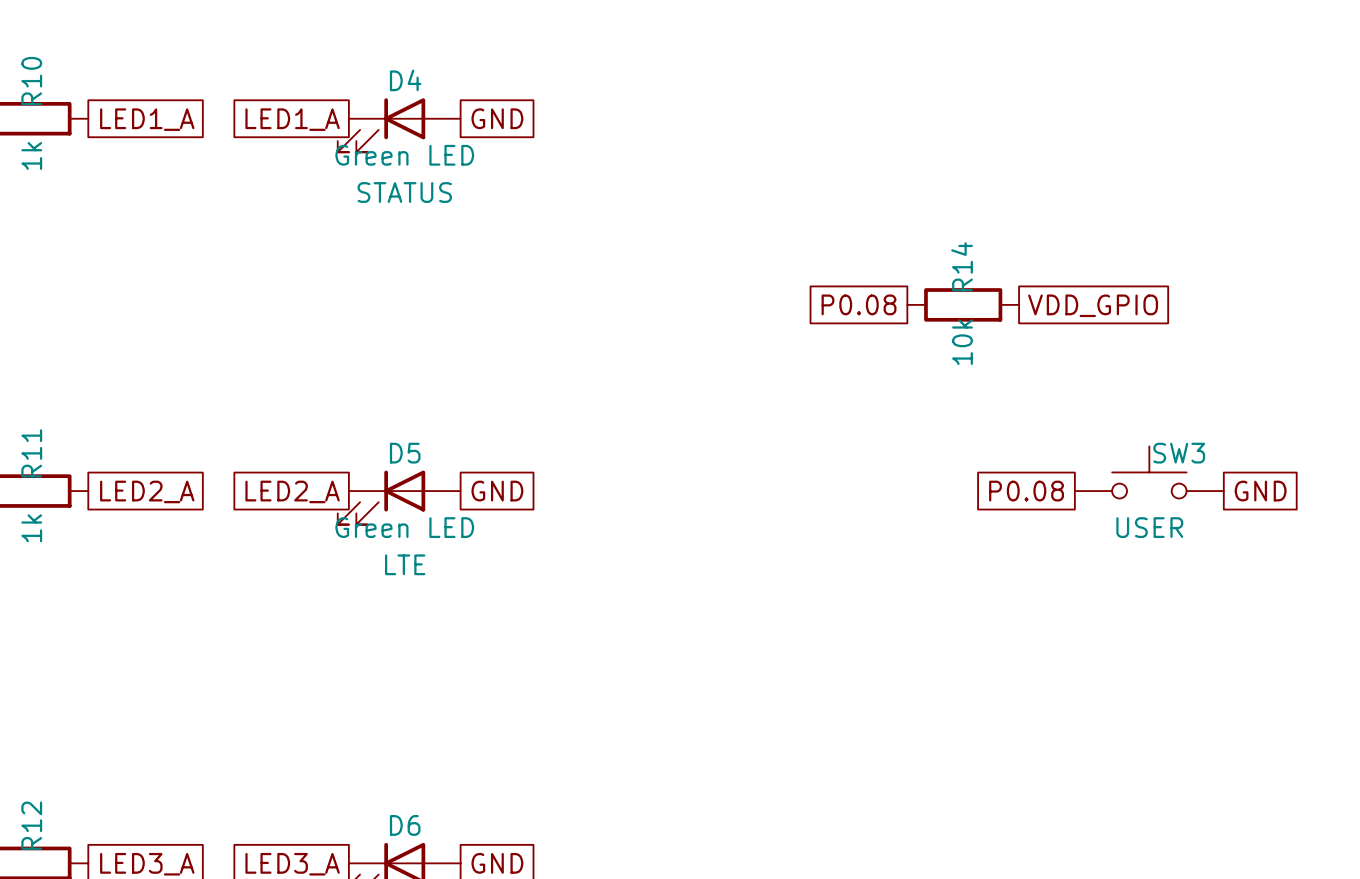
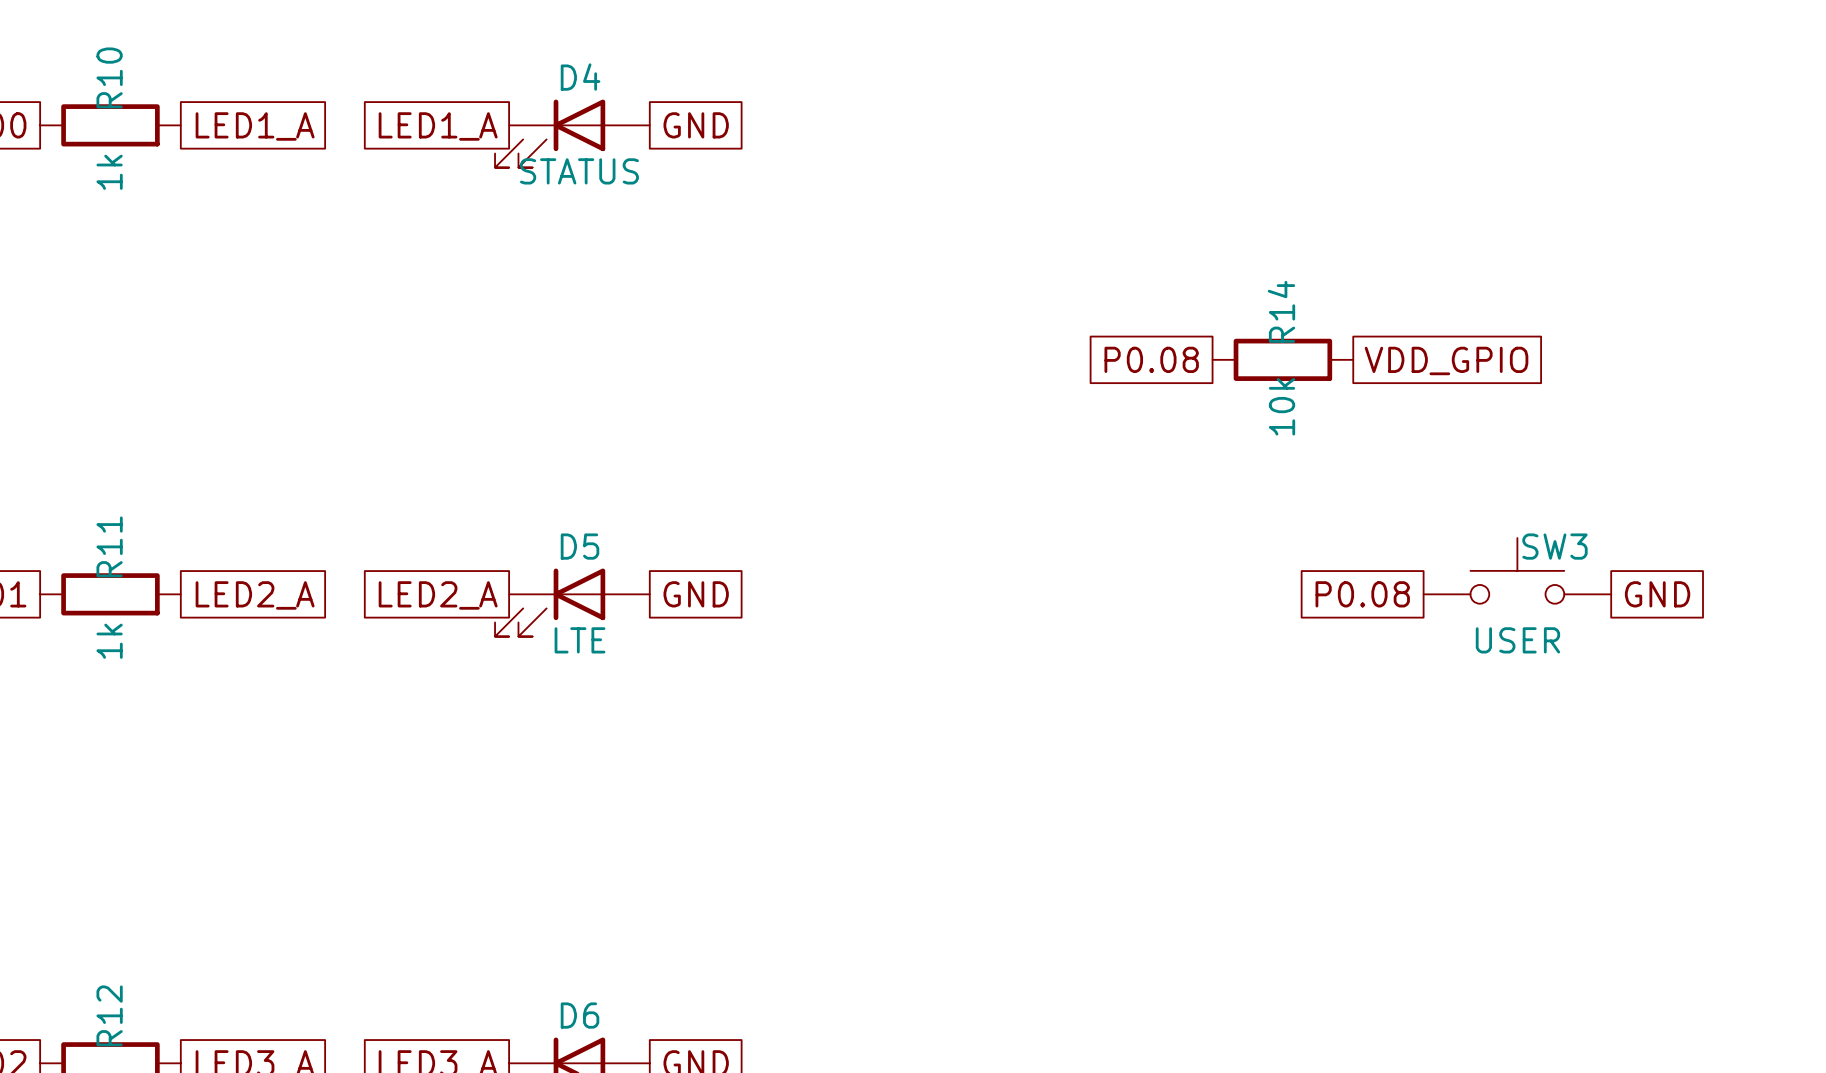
D4 value: Green LED (404, 155) -> STATUS (579, 171)
D4 text: STATUS (404, 192) -> none
D5 value: Green LED (404, 527) -> LTE (580, 640)
D5 text: LTE (405, 564) -> none

